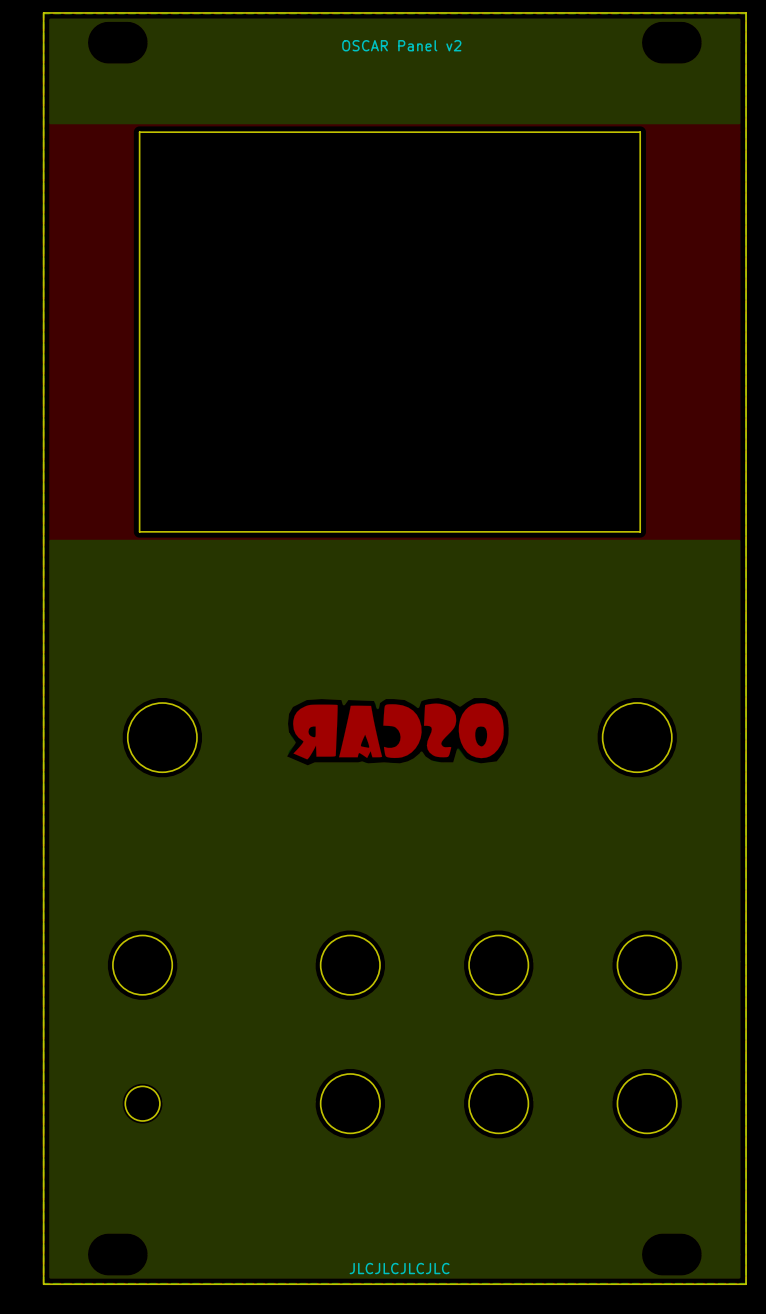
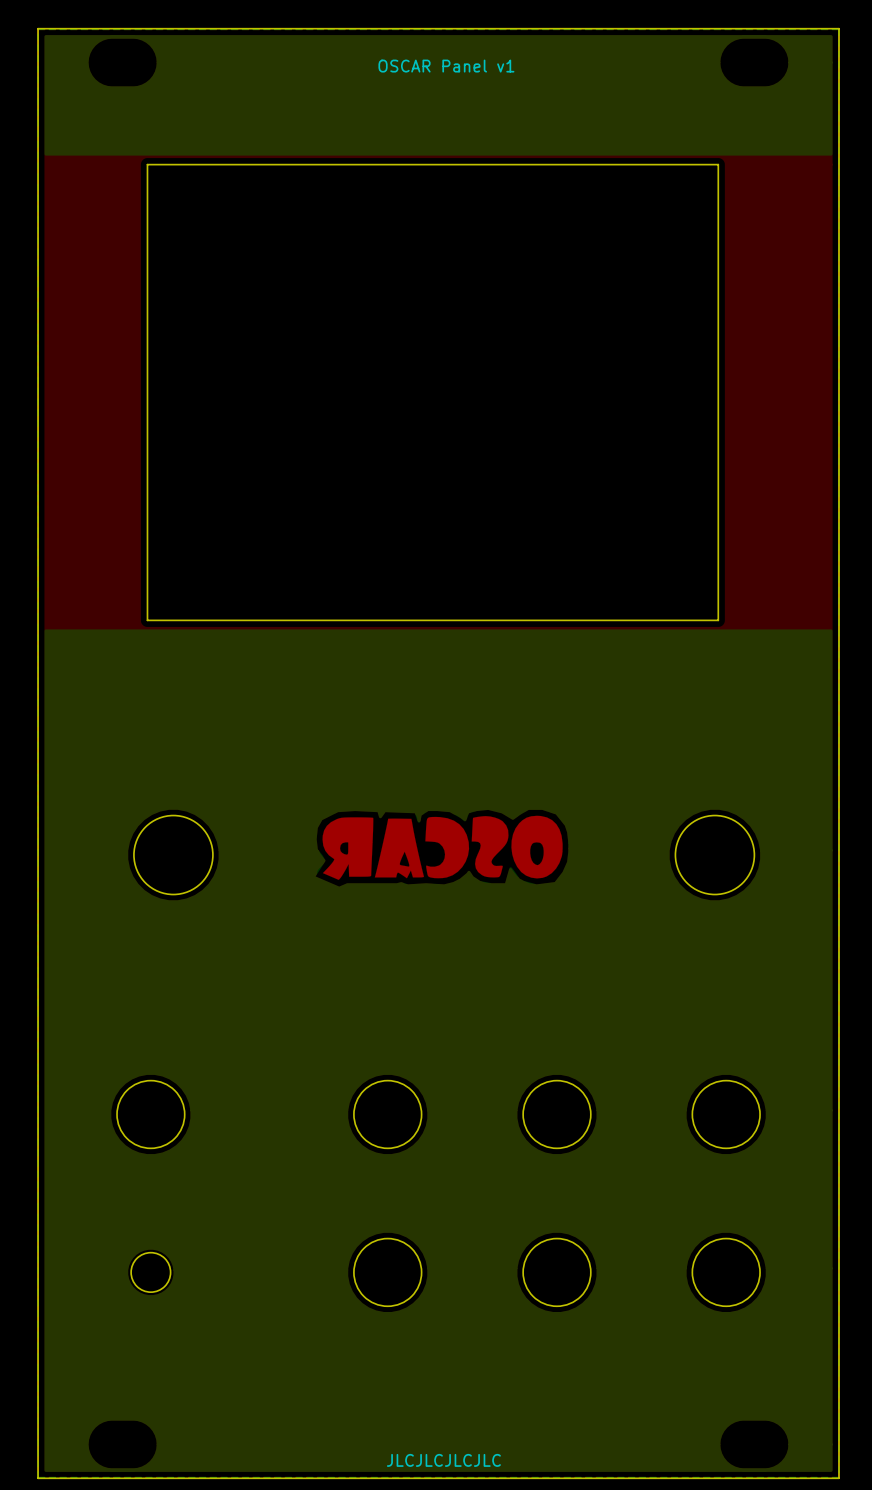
text: OSCAR Panel v2 (401, 45) -> OSCAR Panel v1 (446, 66)

